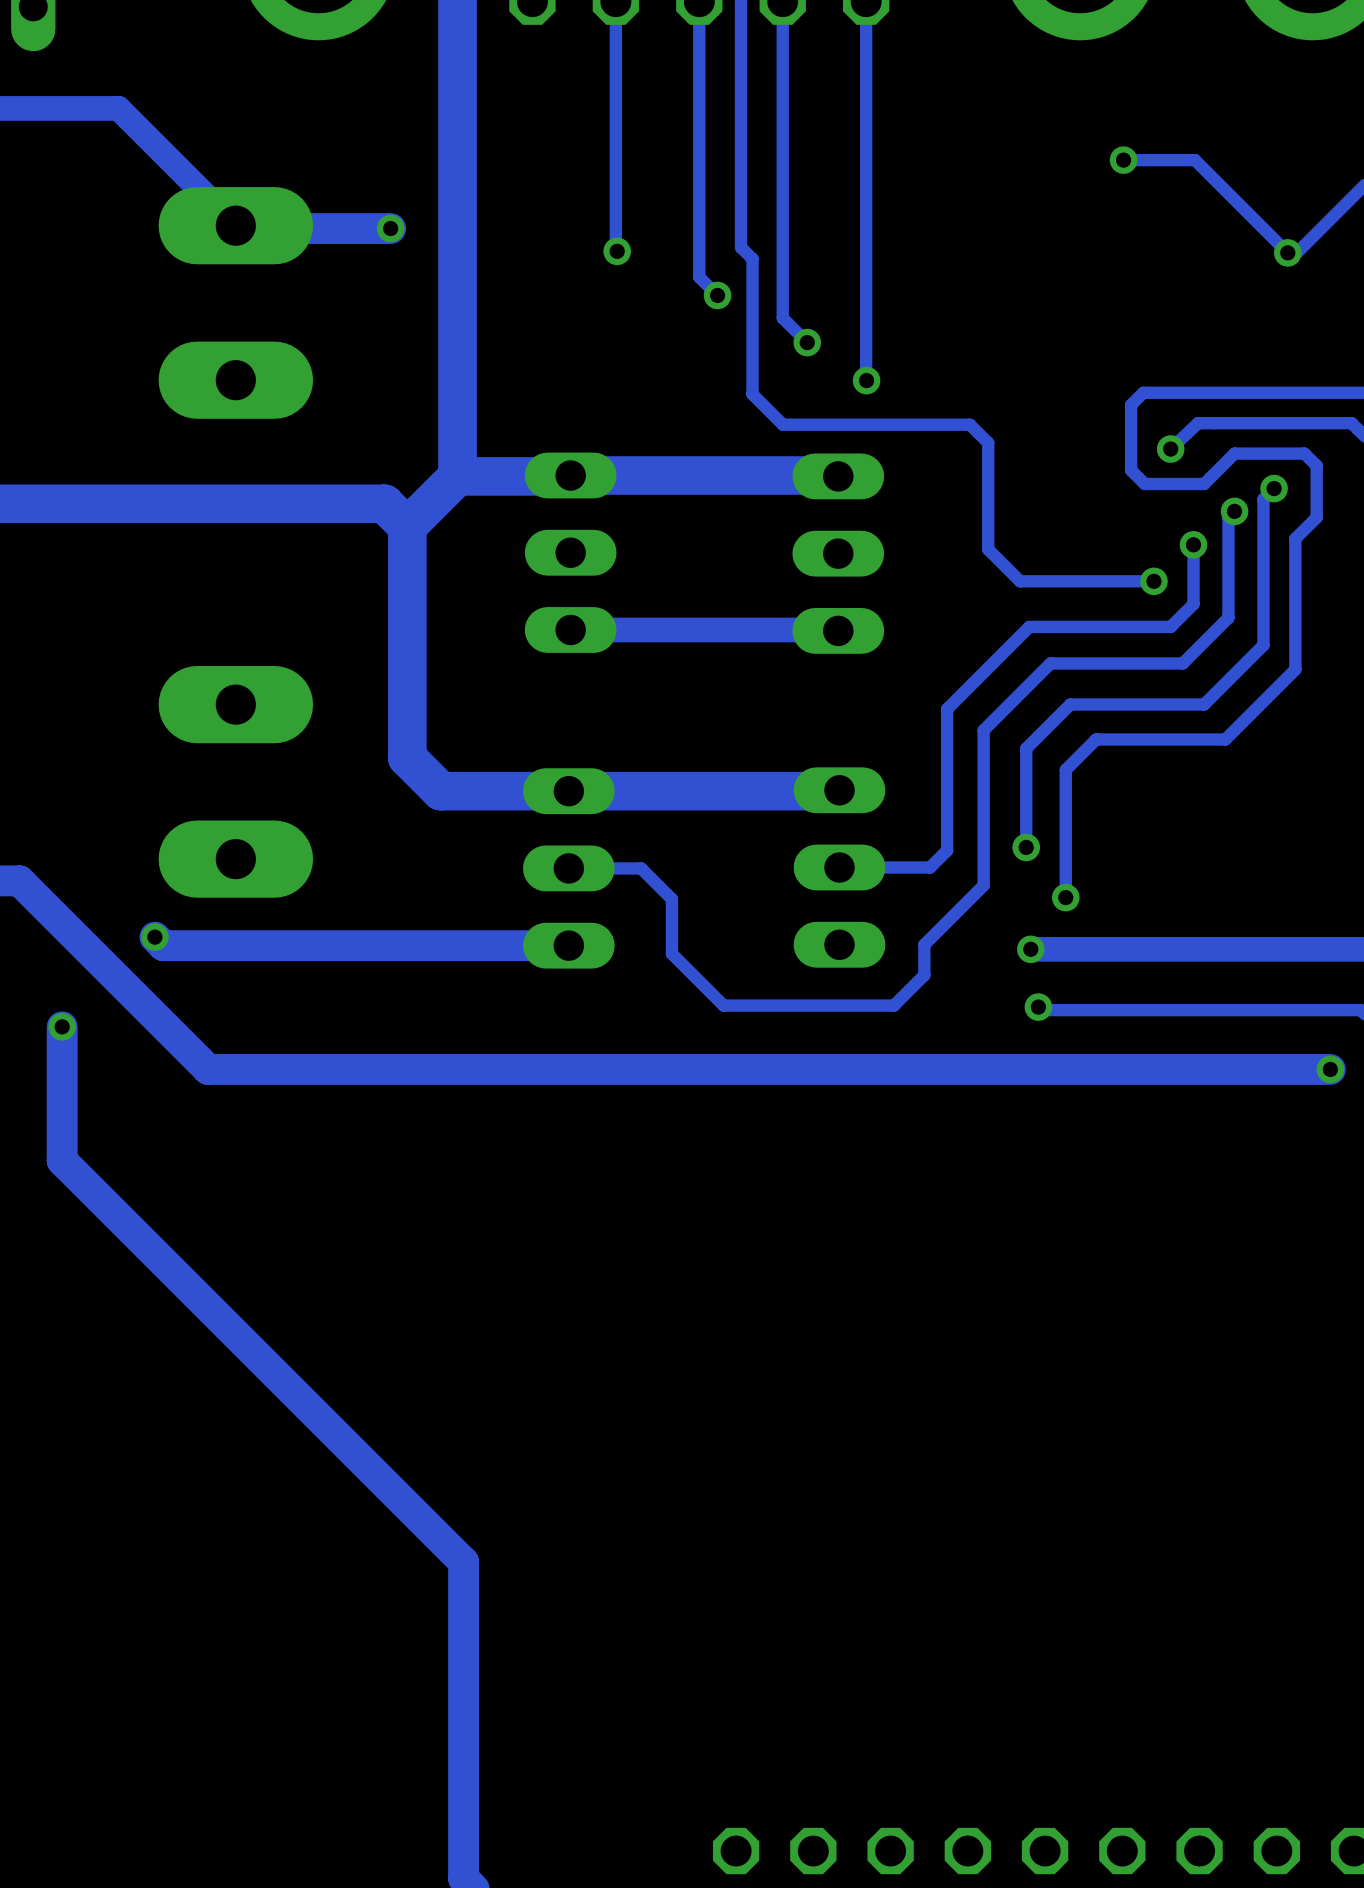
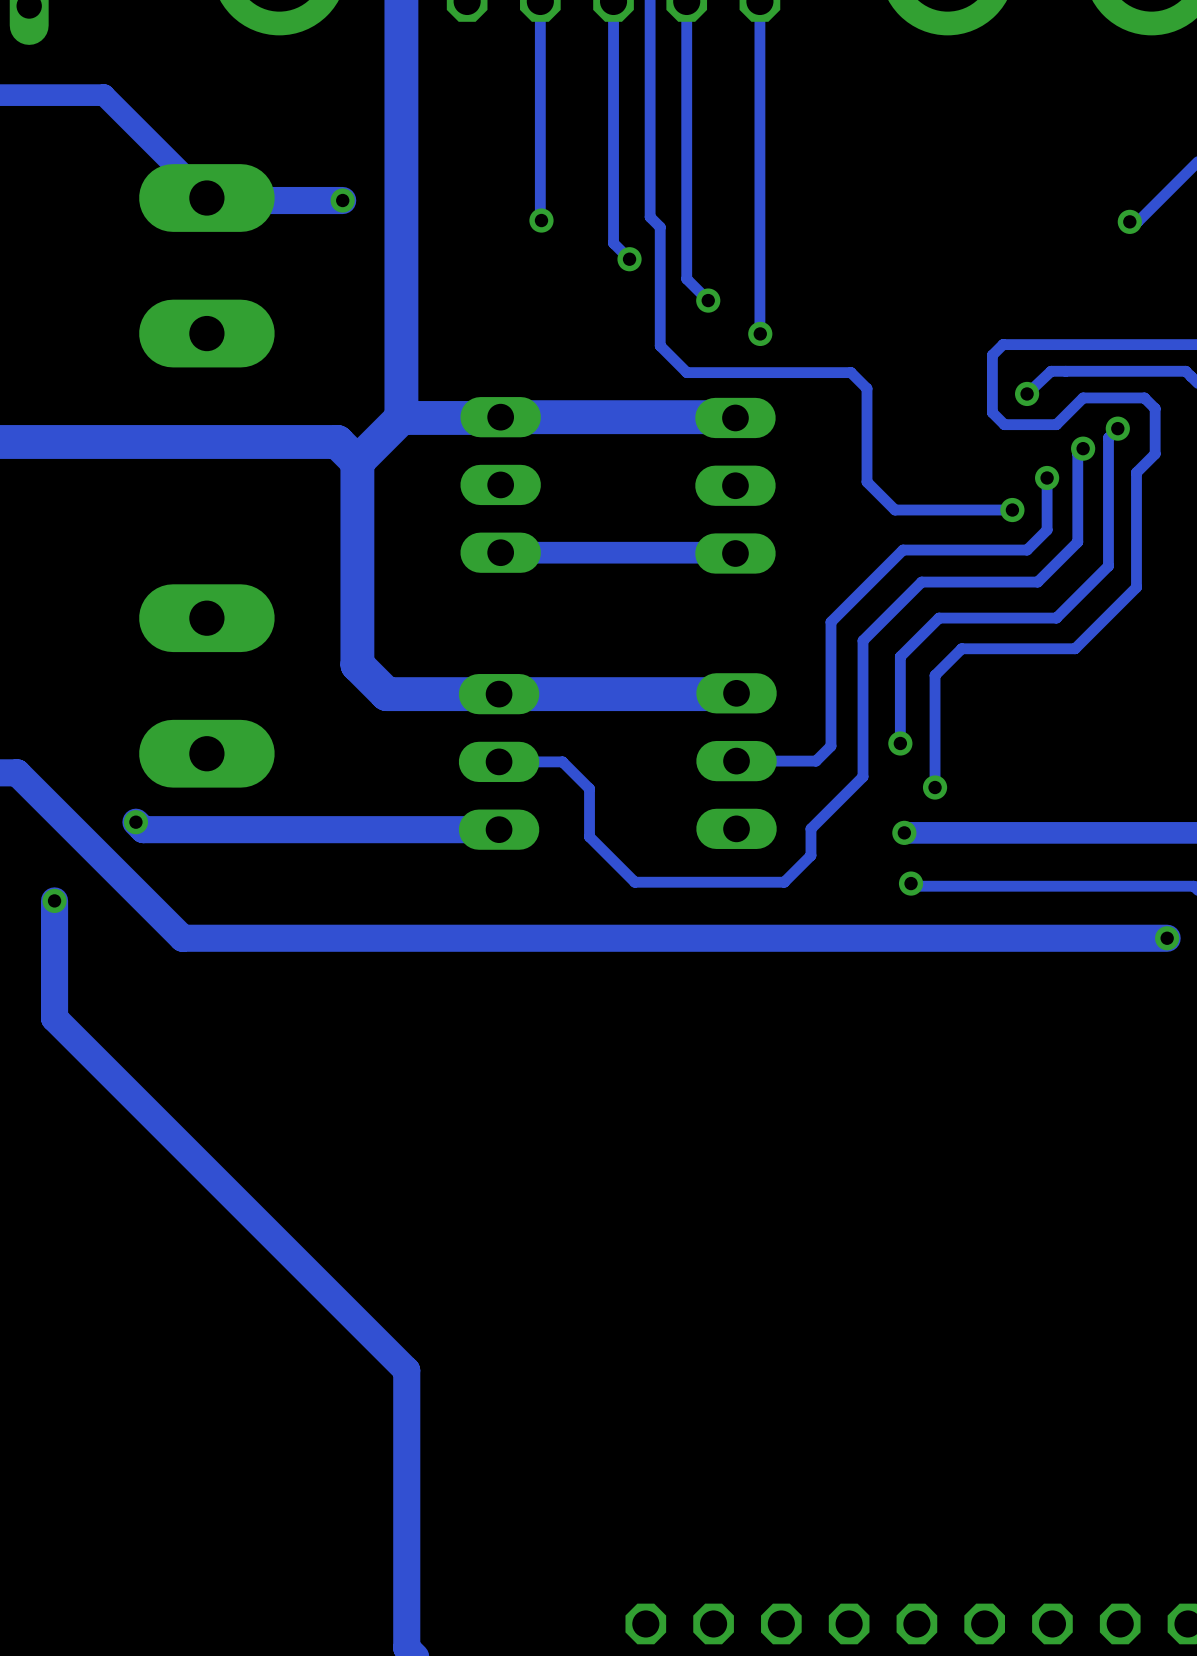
track: (1123, 160) (1195, 160) (1287, 252) -> none
via: (1123, 160) -> none

